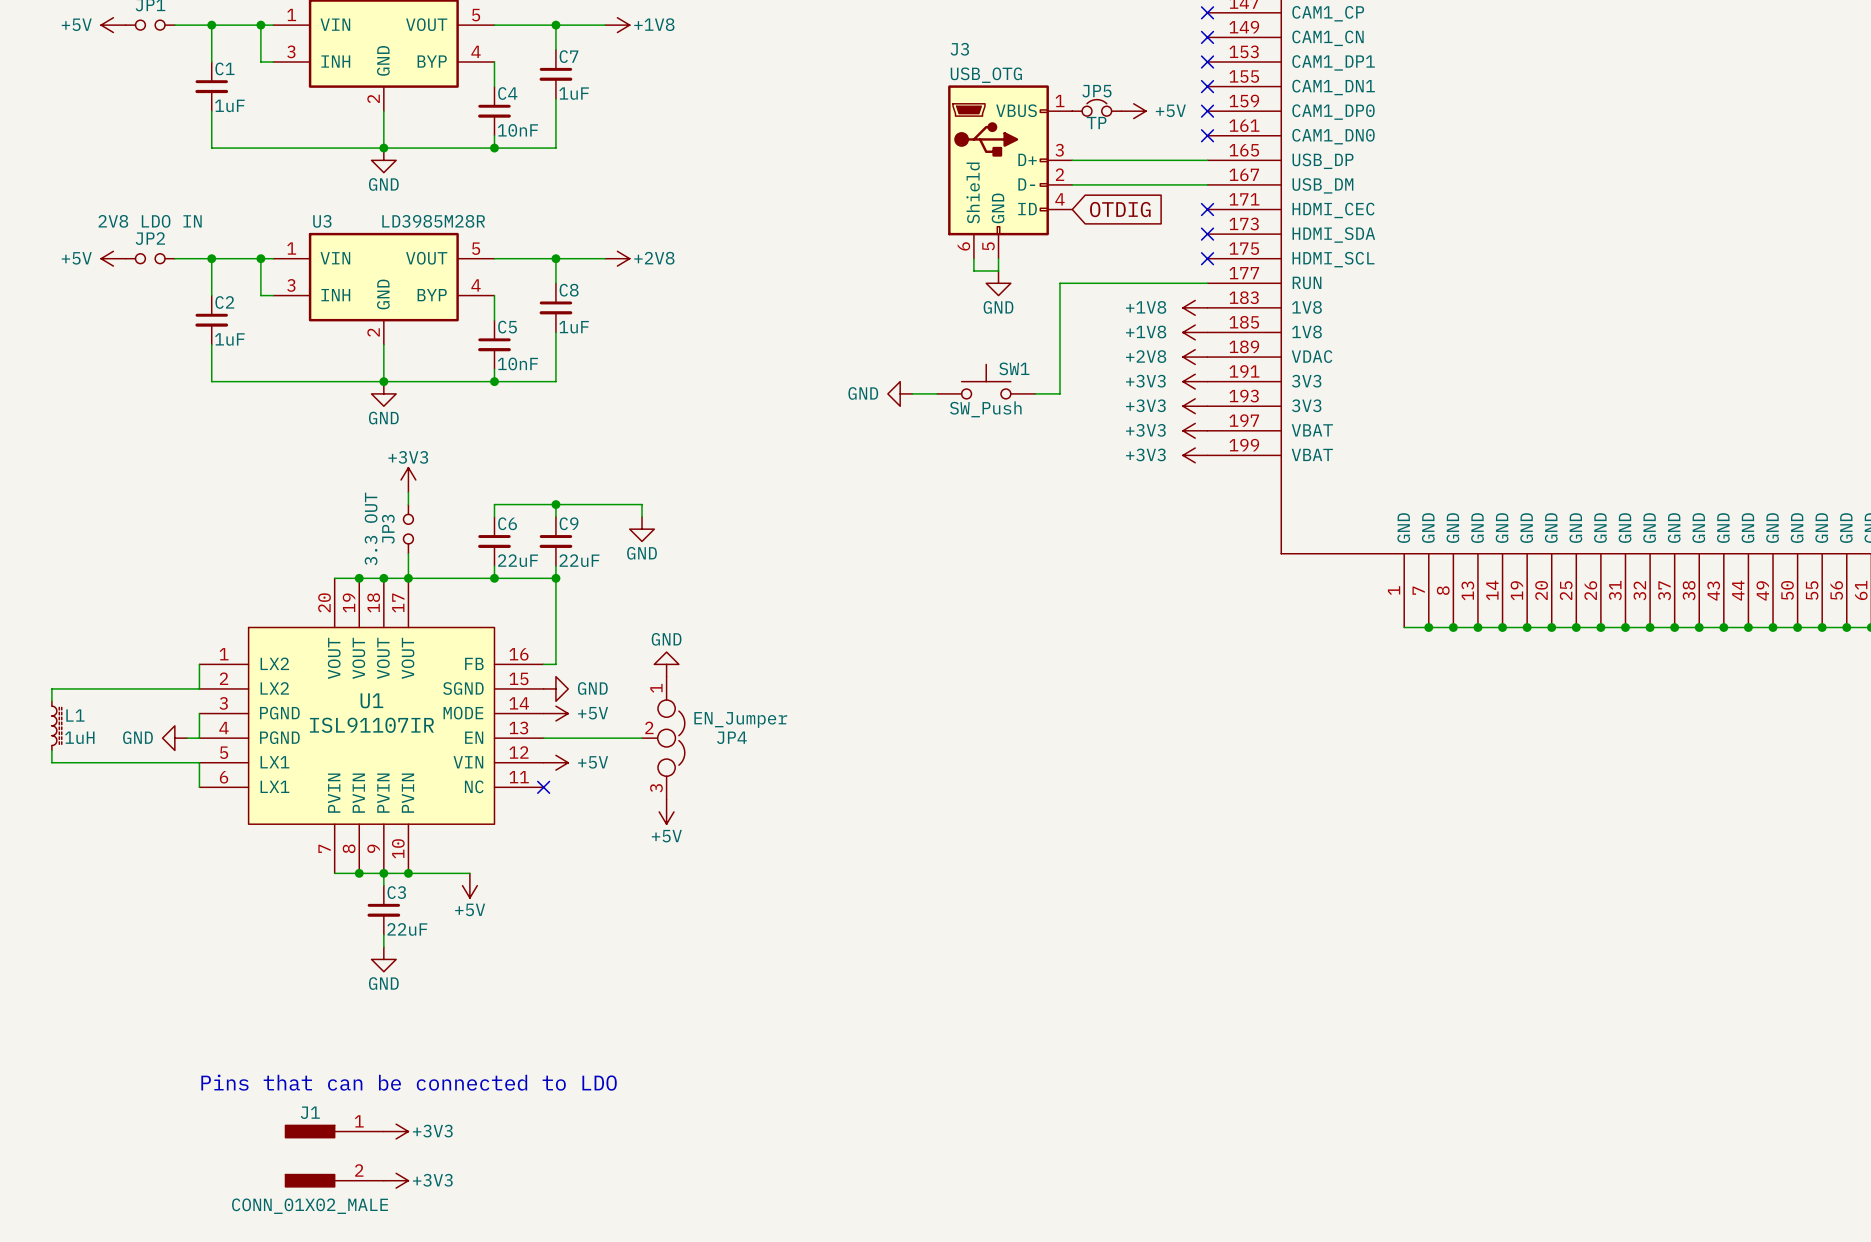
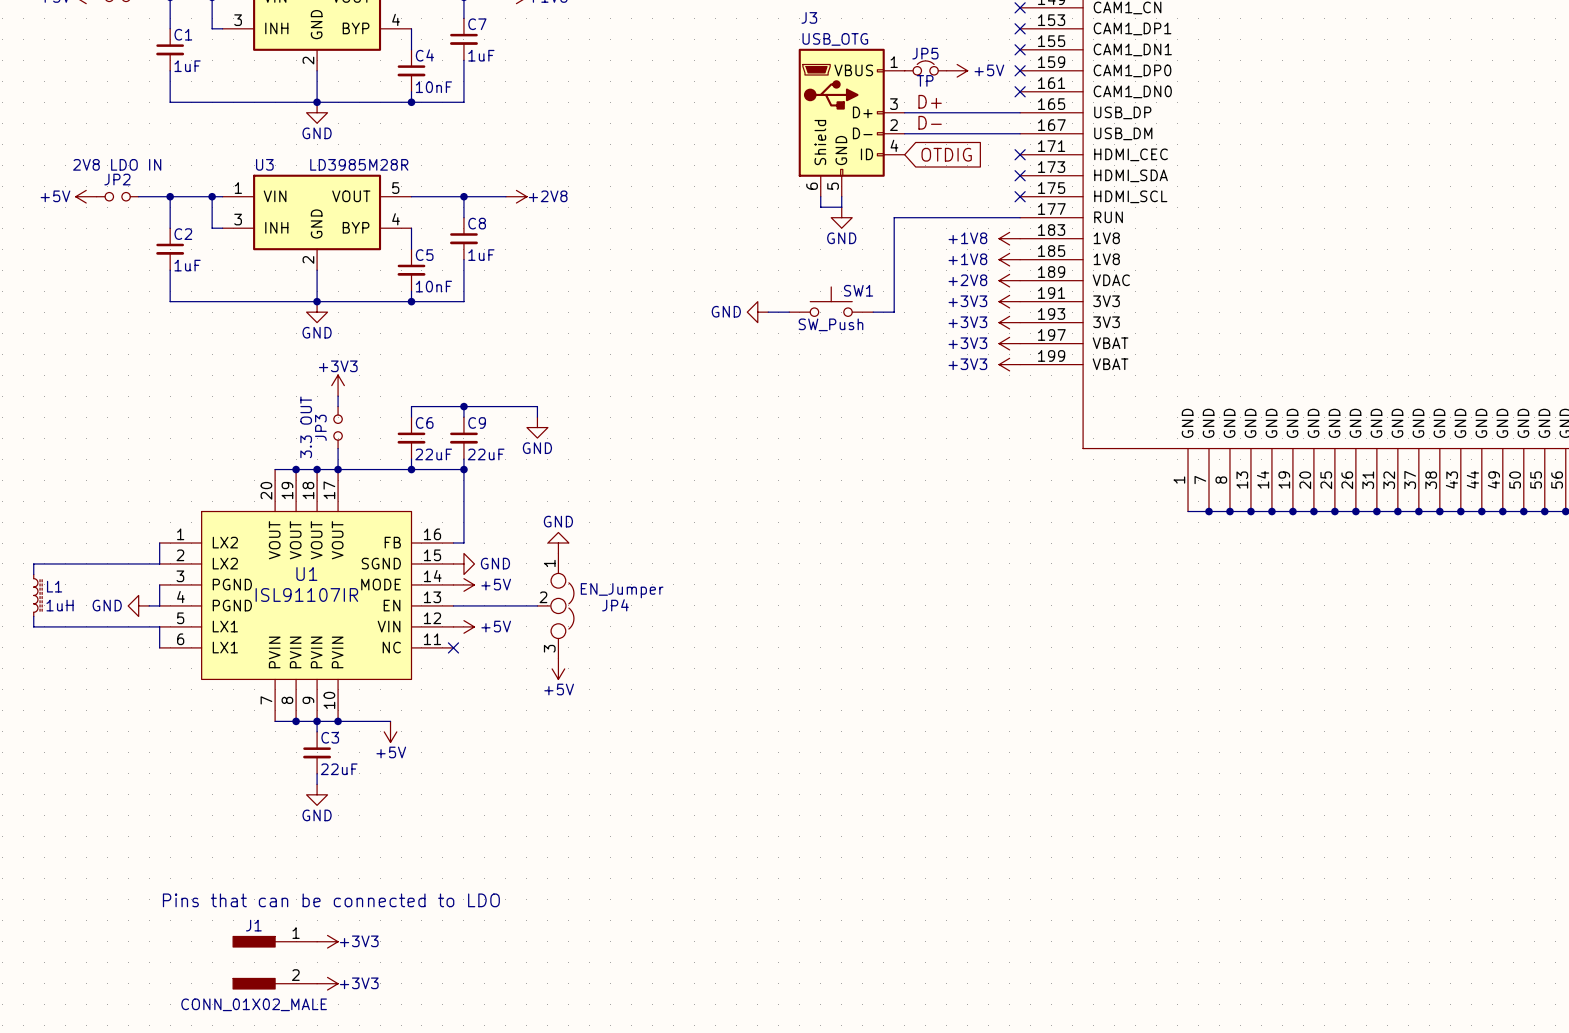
label: none -> D+ (930, 101)
label: none -> D- (930, 122)

